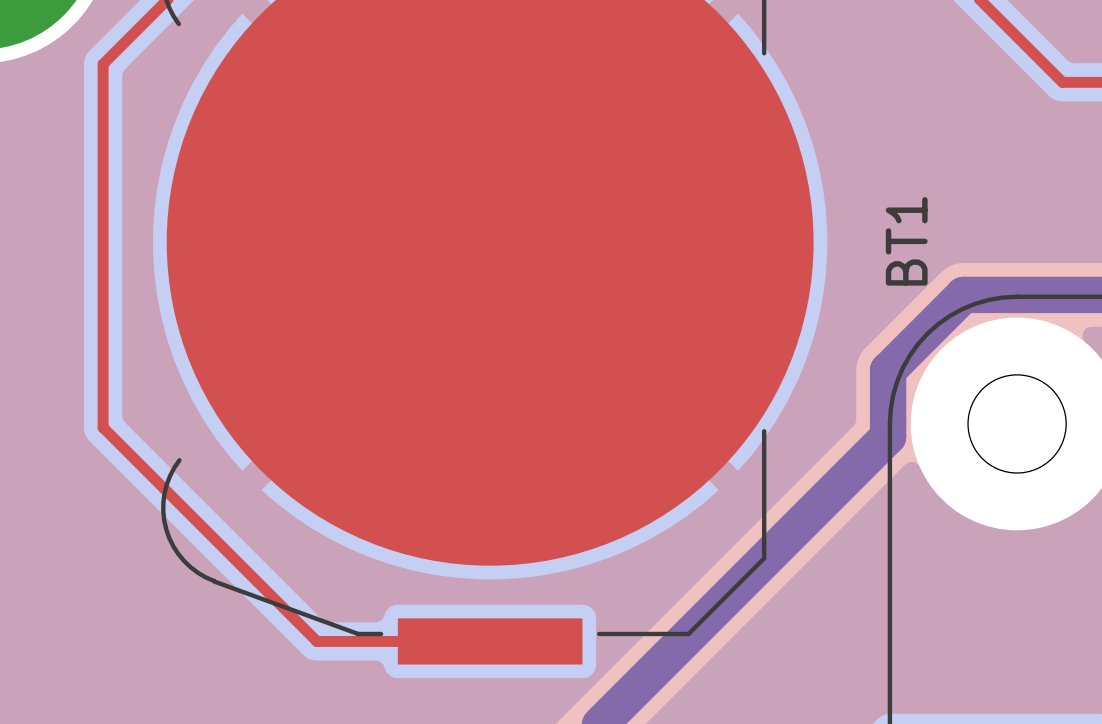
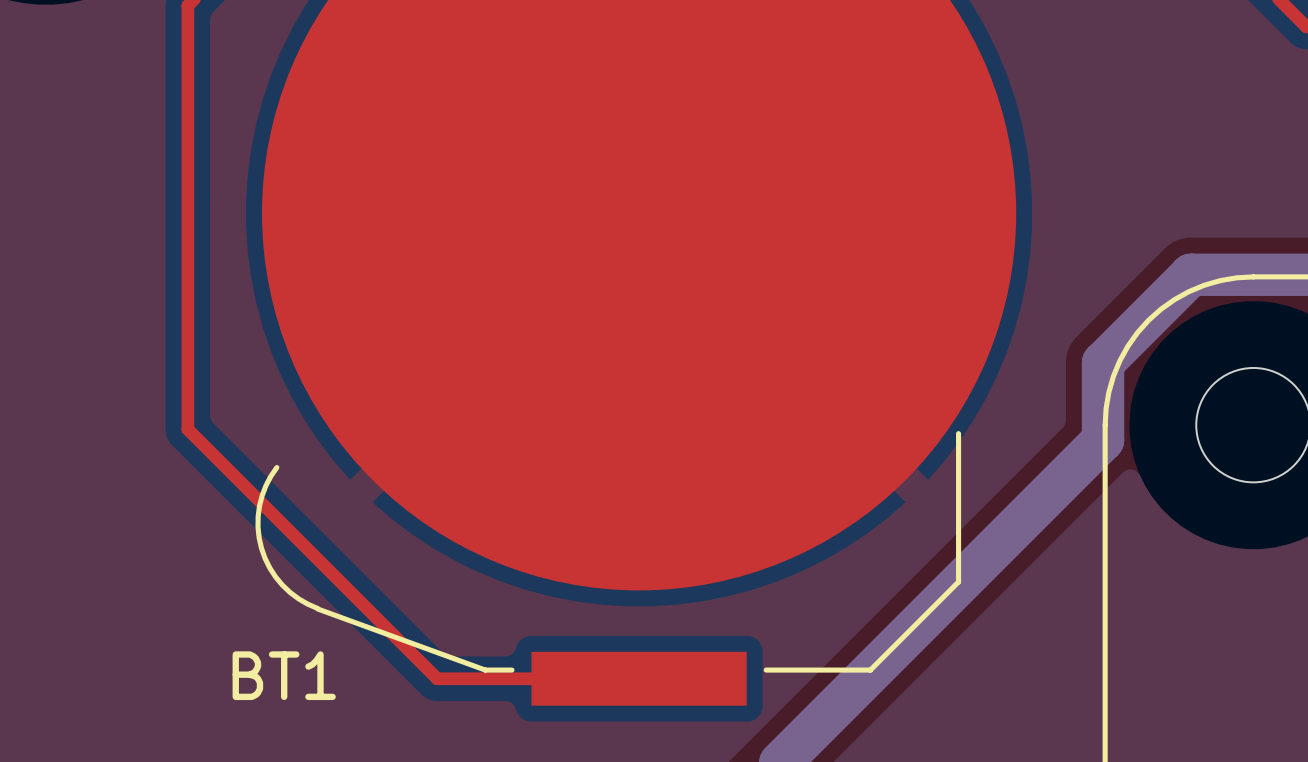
BT1 name rotation: 0° (906, 241) -> 90° clockwise (284, 675)
BT1 name position: BT1 (906, 241) -> BT1 (284, 675)

